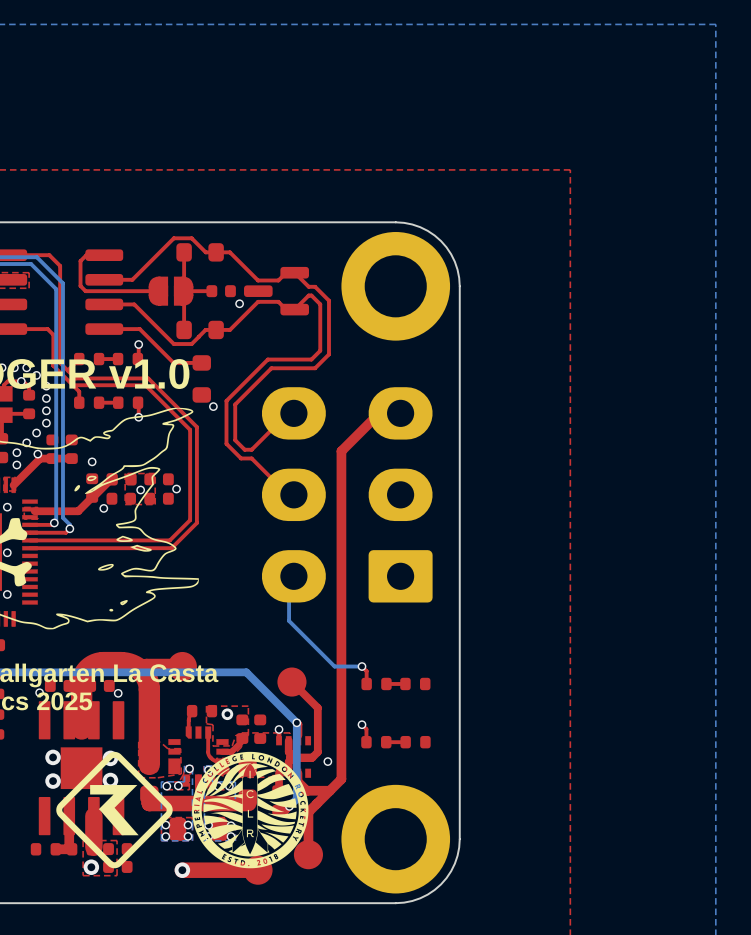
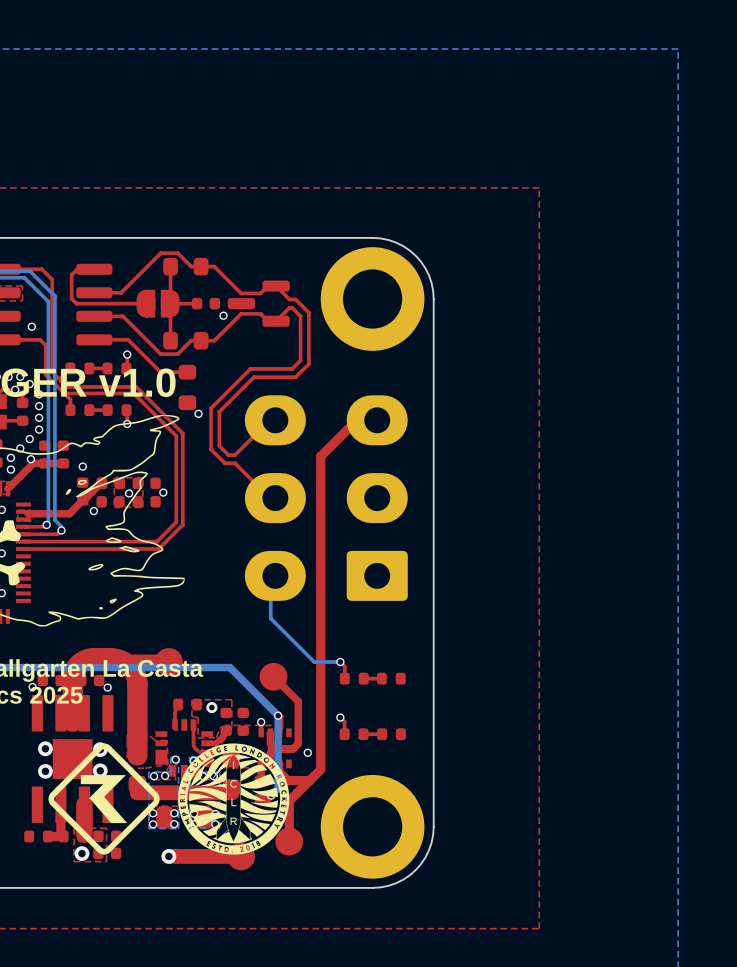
via: none -> (31, 326)

